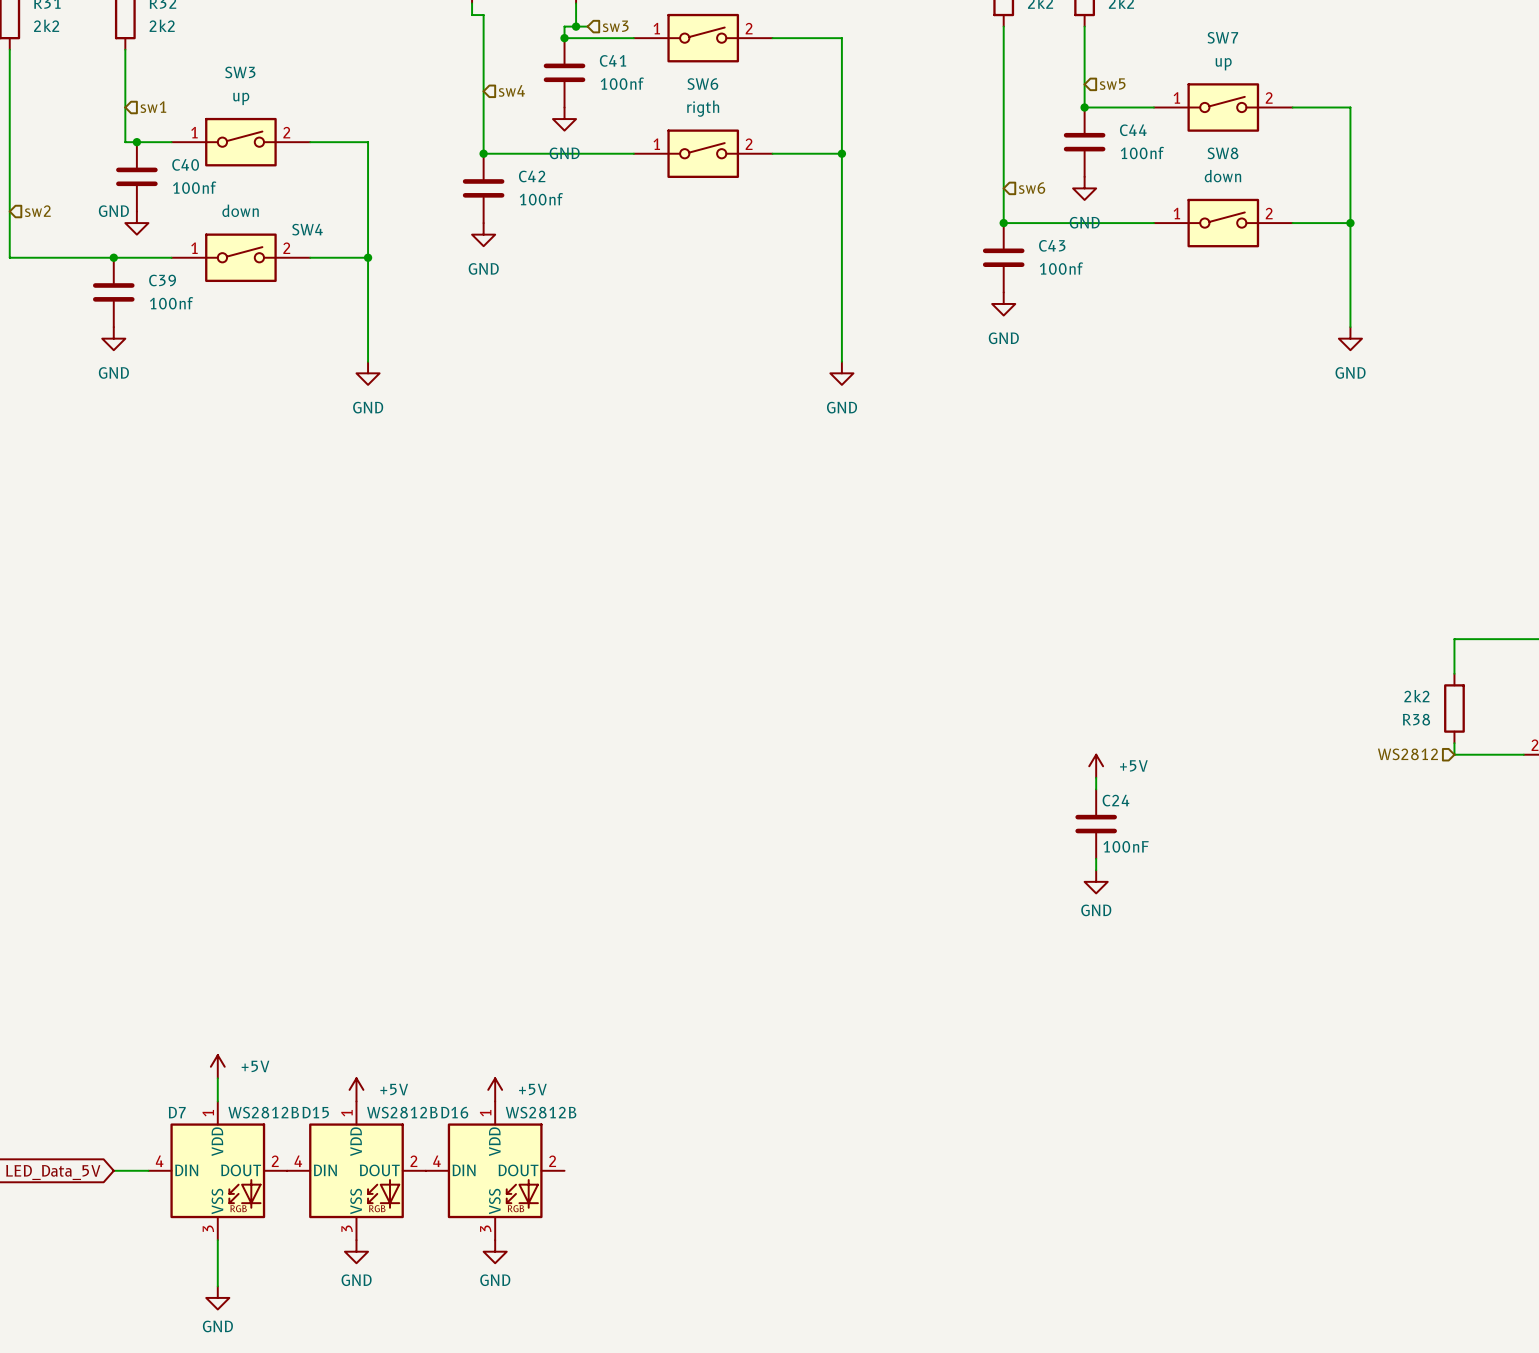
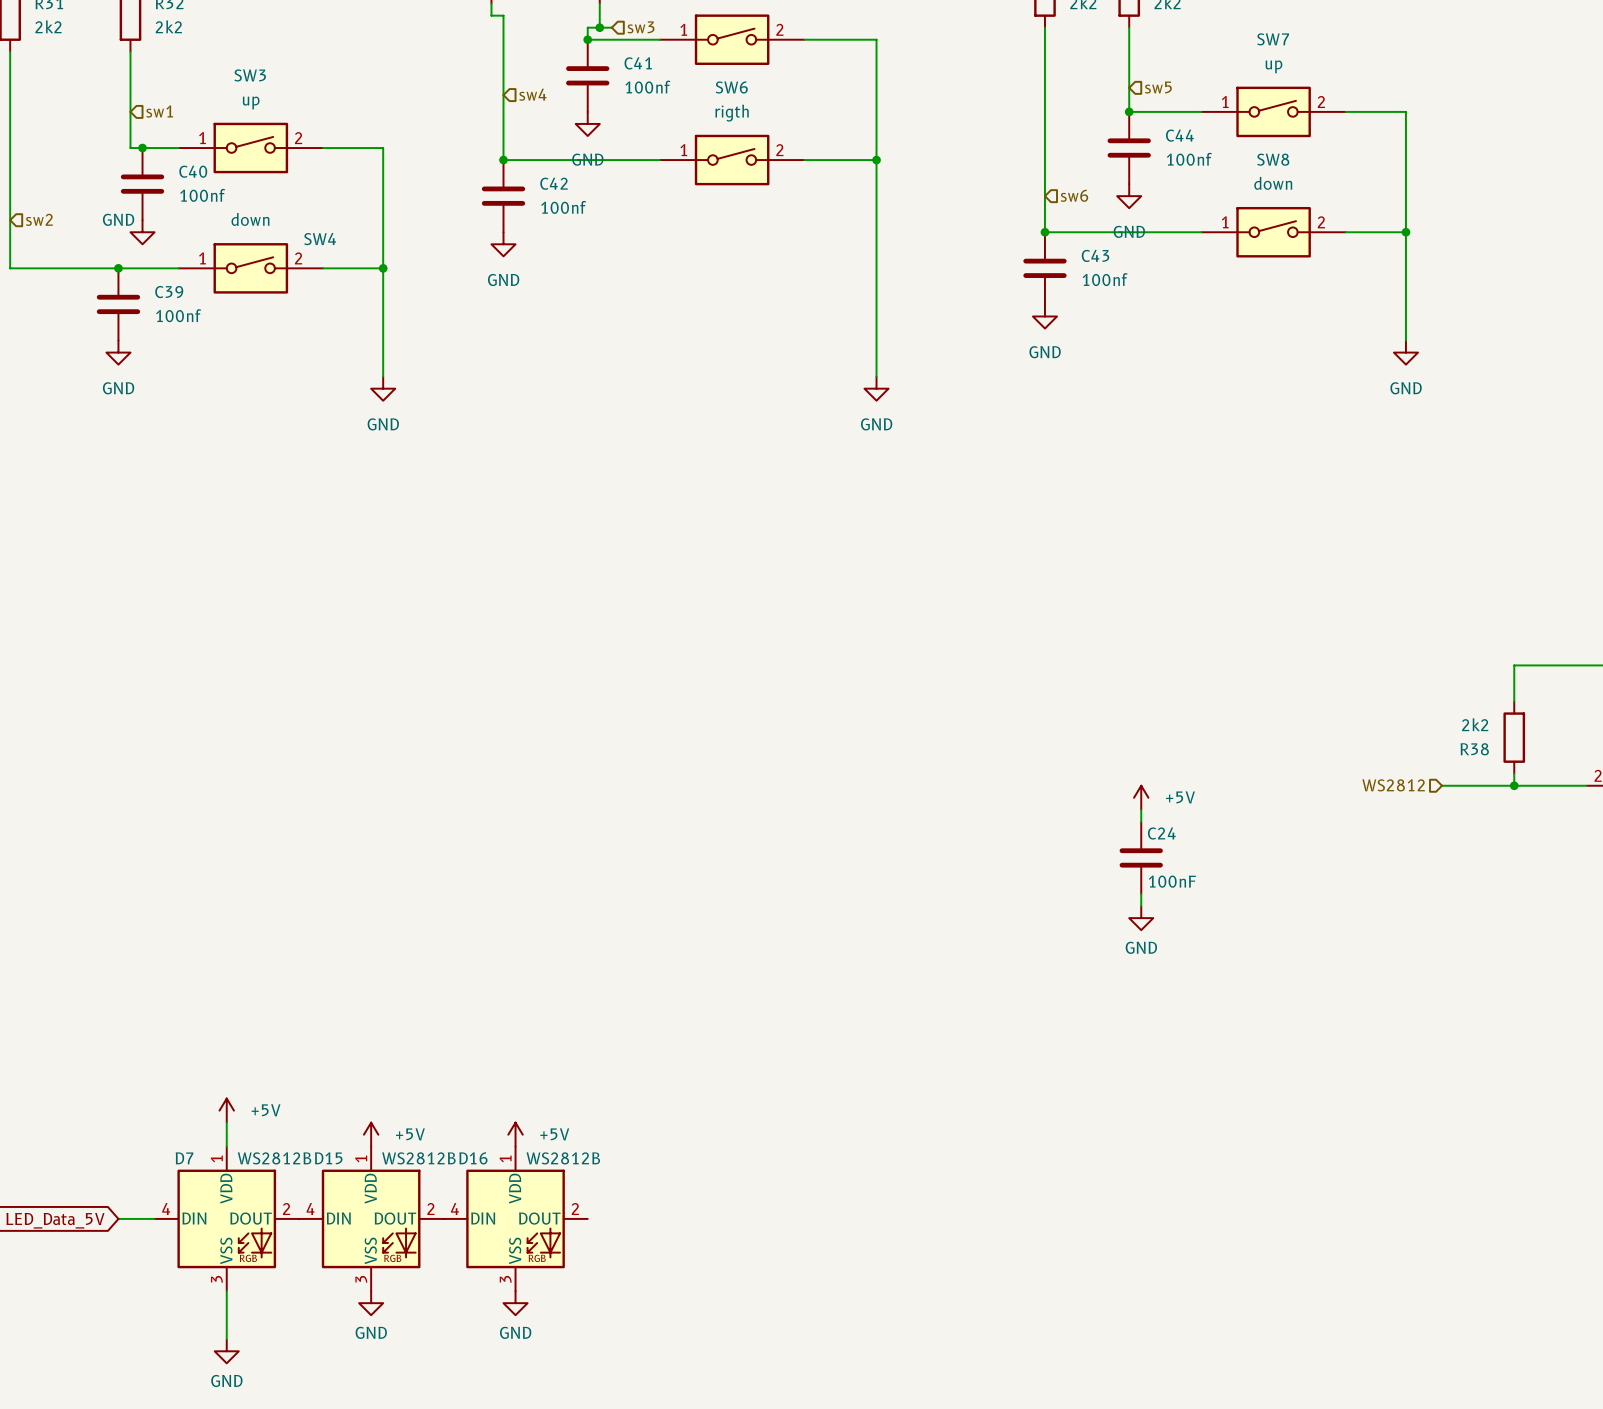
wire: none -> (1442, 785) (1514, 785)
hierarchical label position: WS2812 (1407, 754) -> WS2812 (1393, 785)
junction: none -> (1514, 785)

